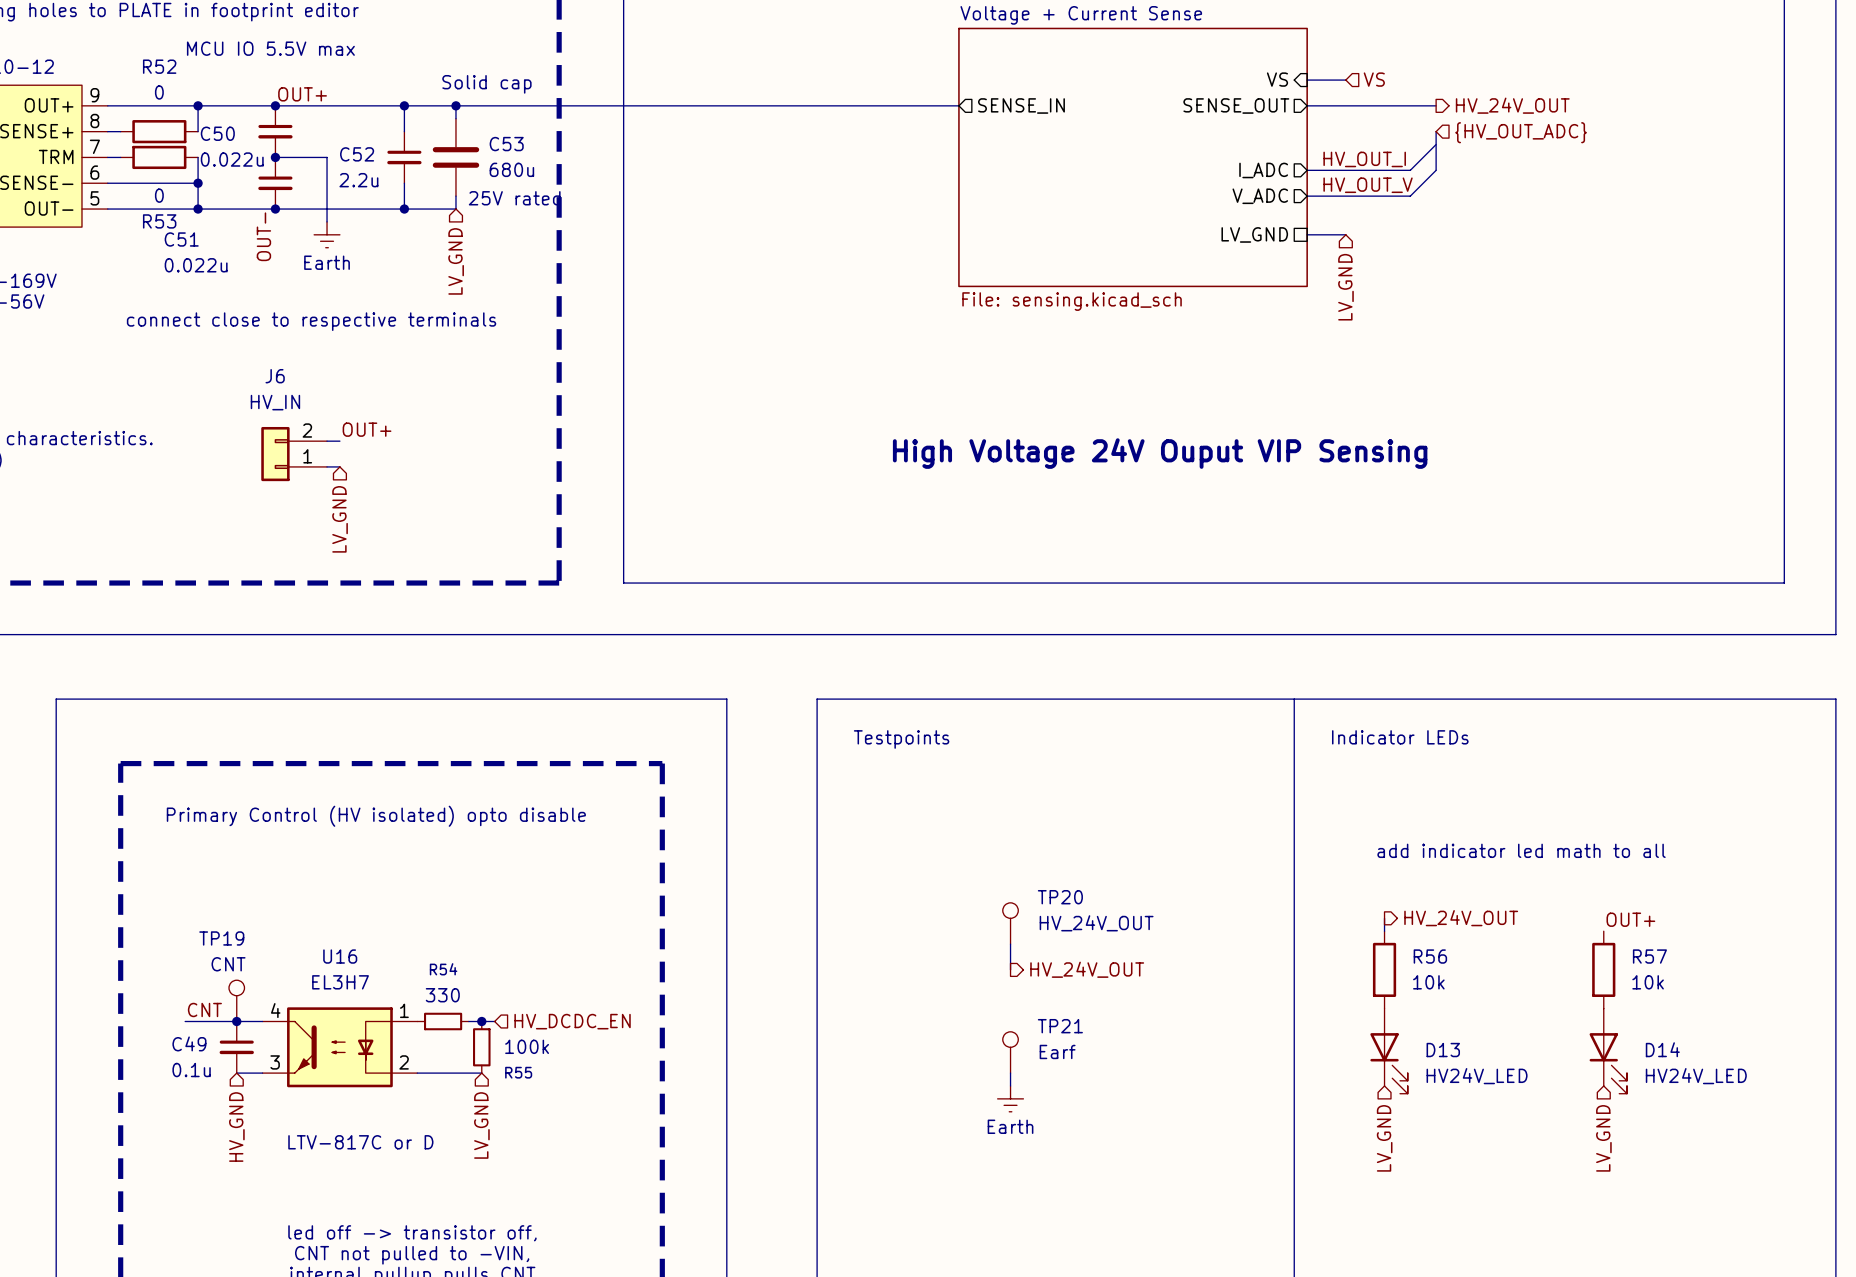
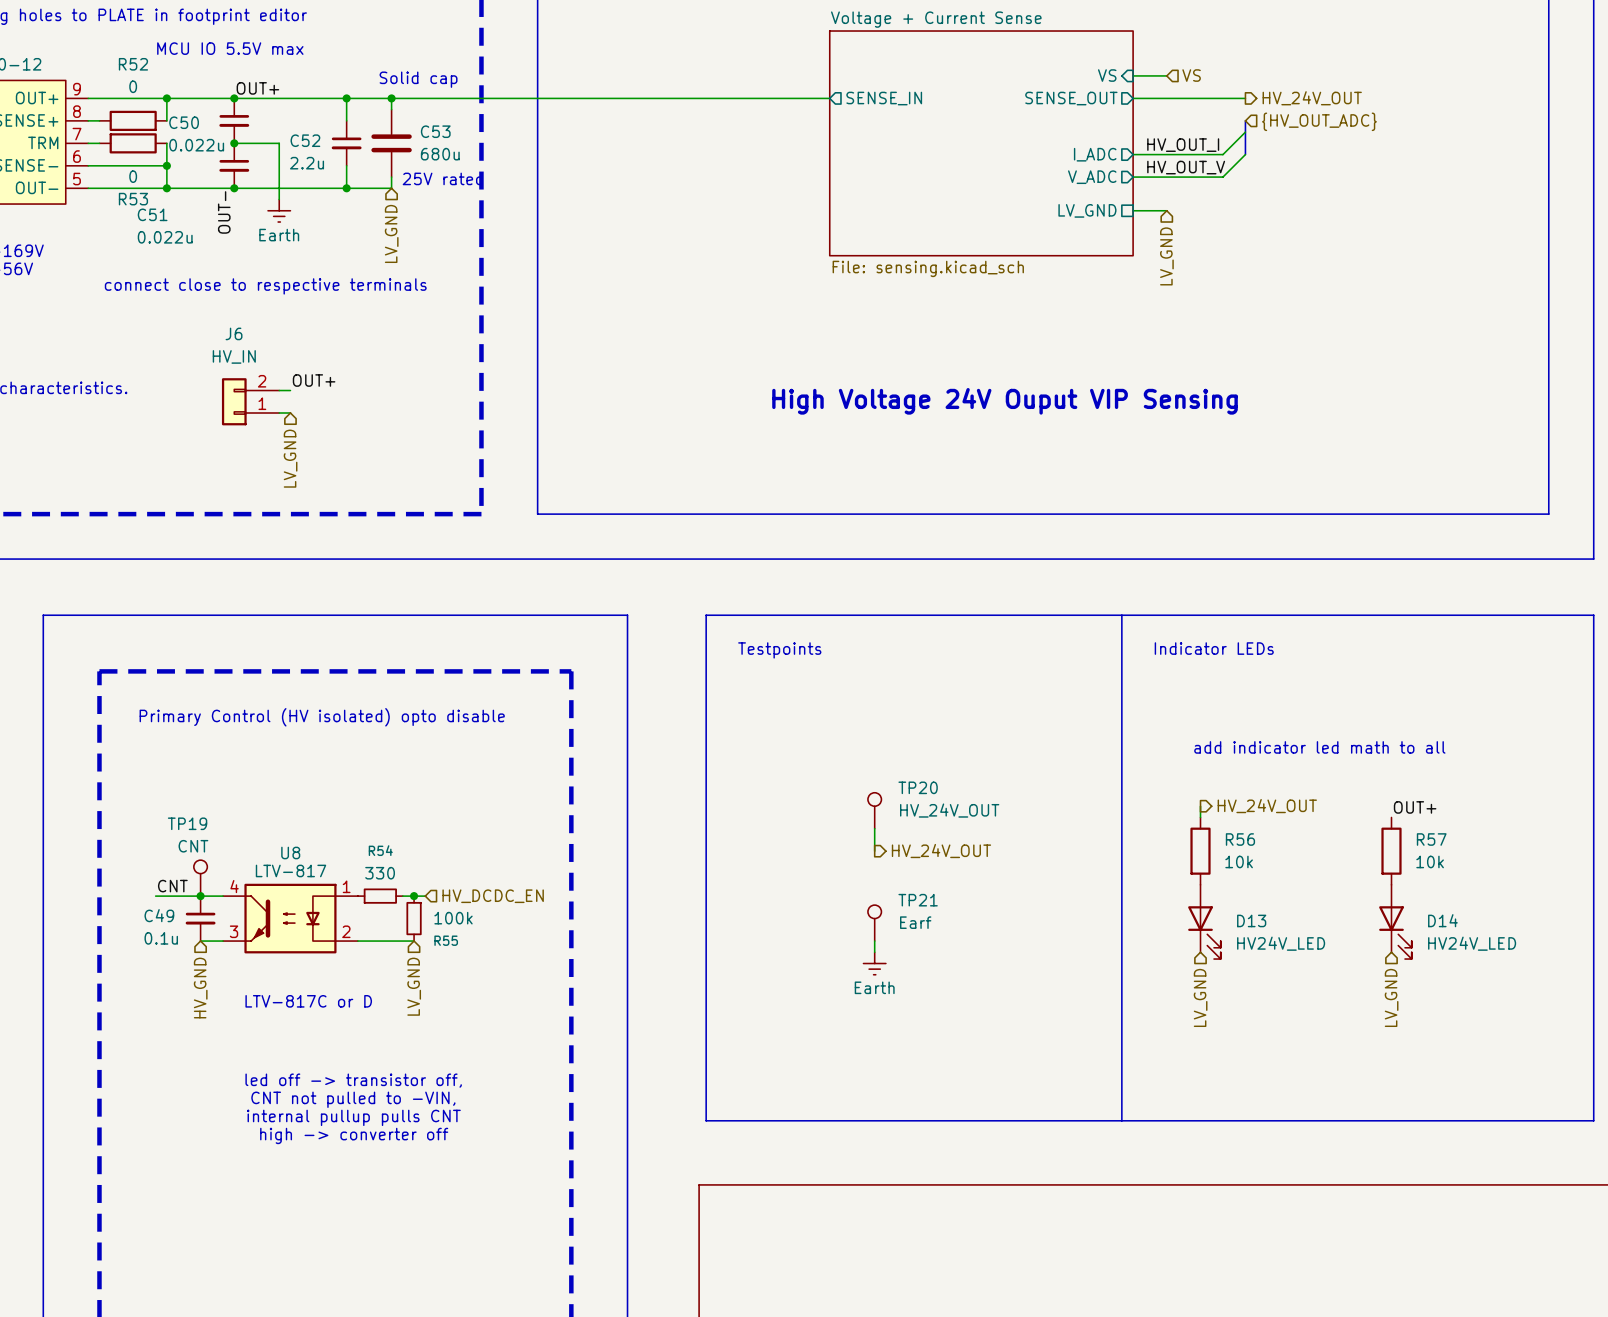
U16: EL3H7 (339, 1047) -> none
U8: none -> LTV-817 (290, 918)

